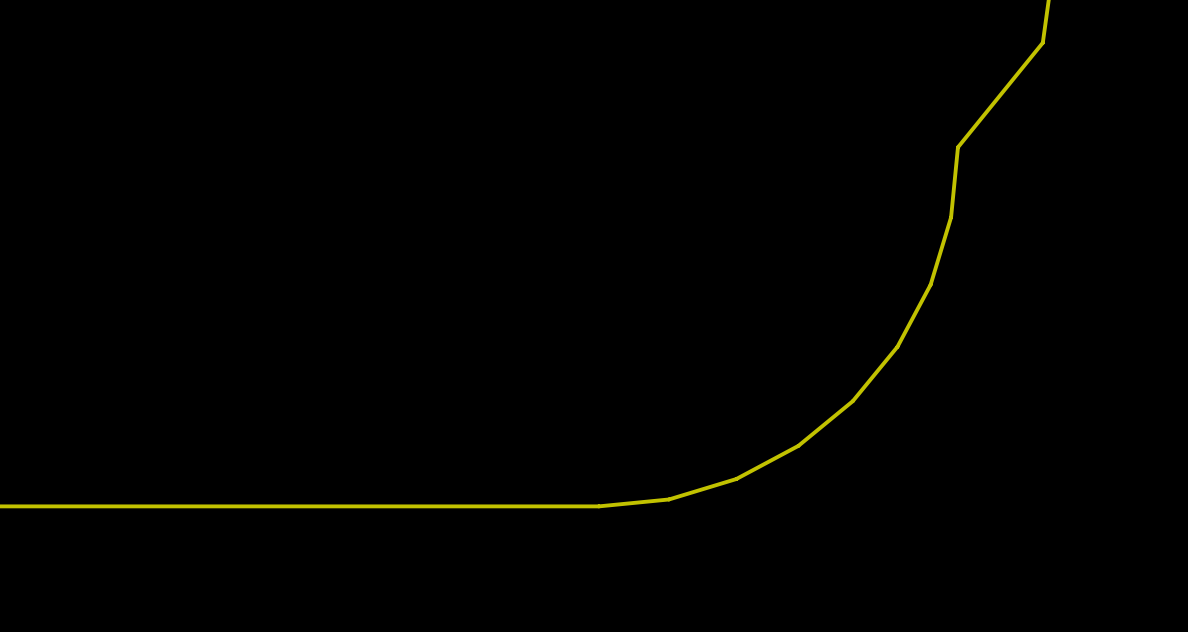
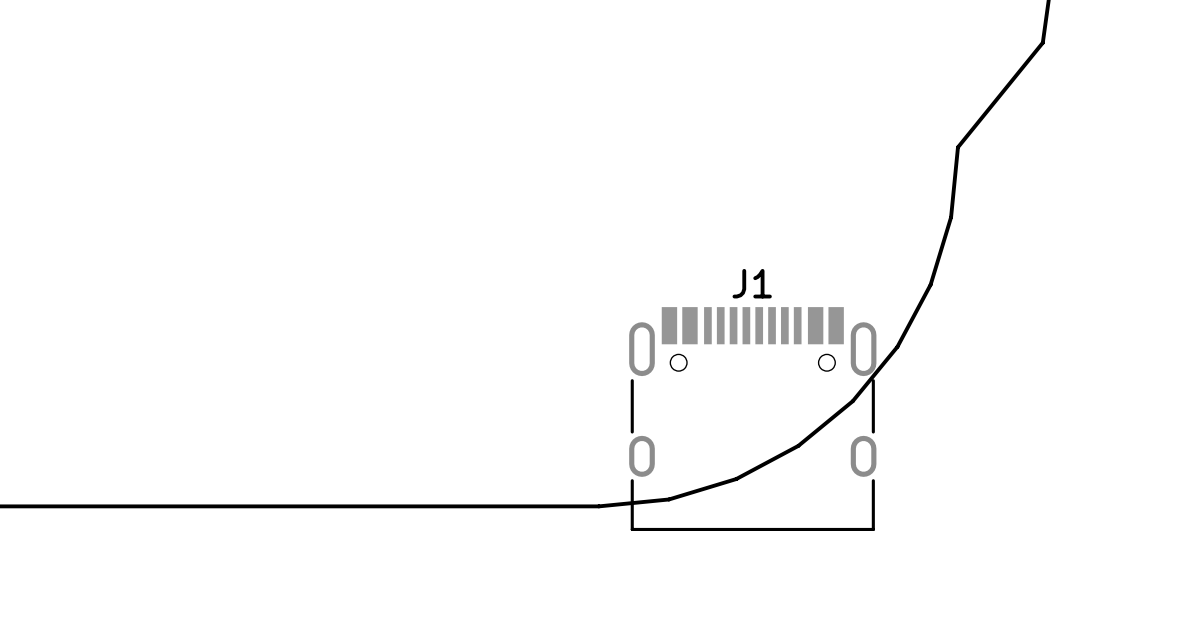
J1: none -> (752, 419)

